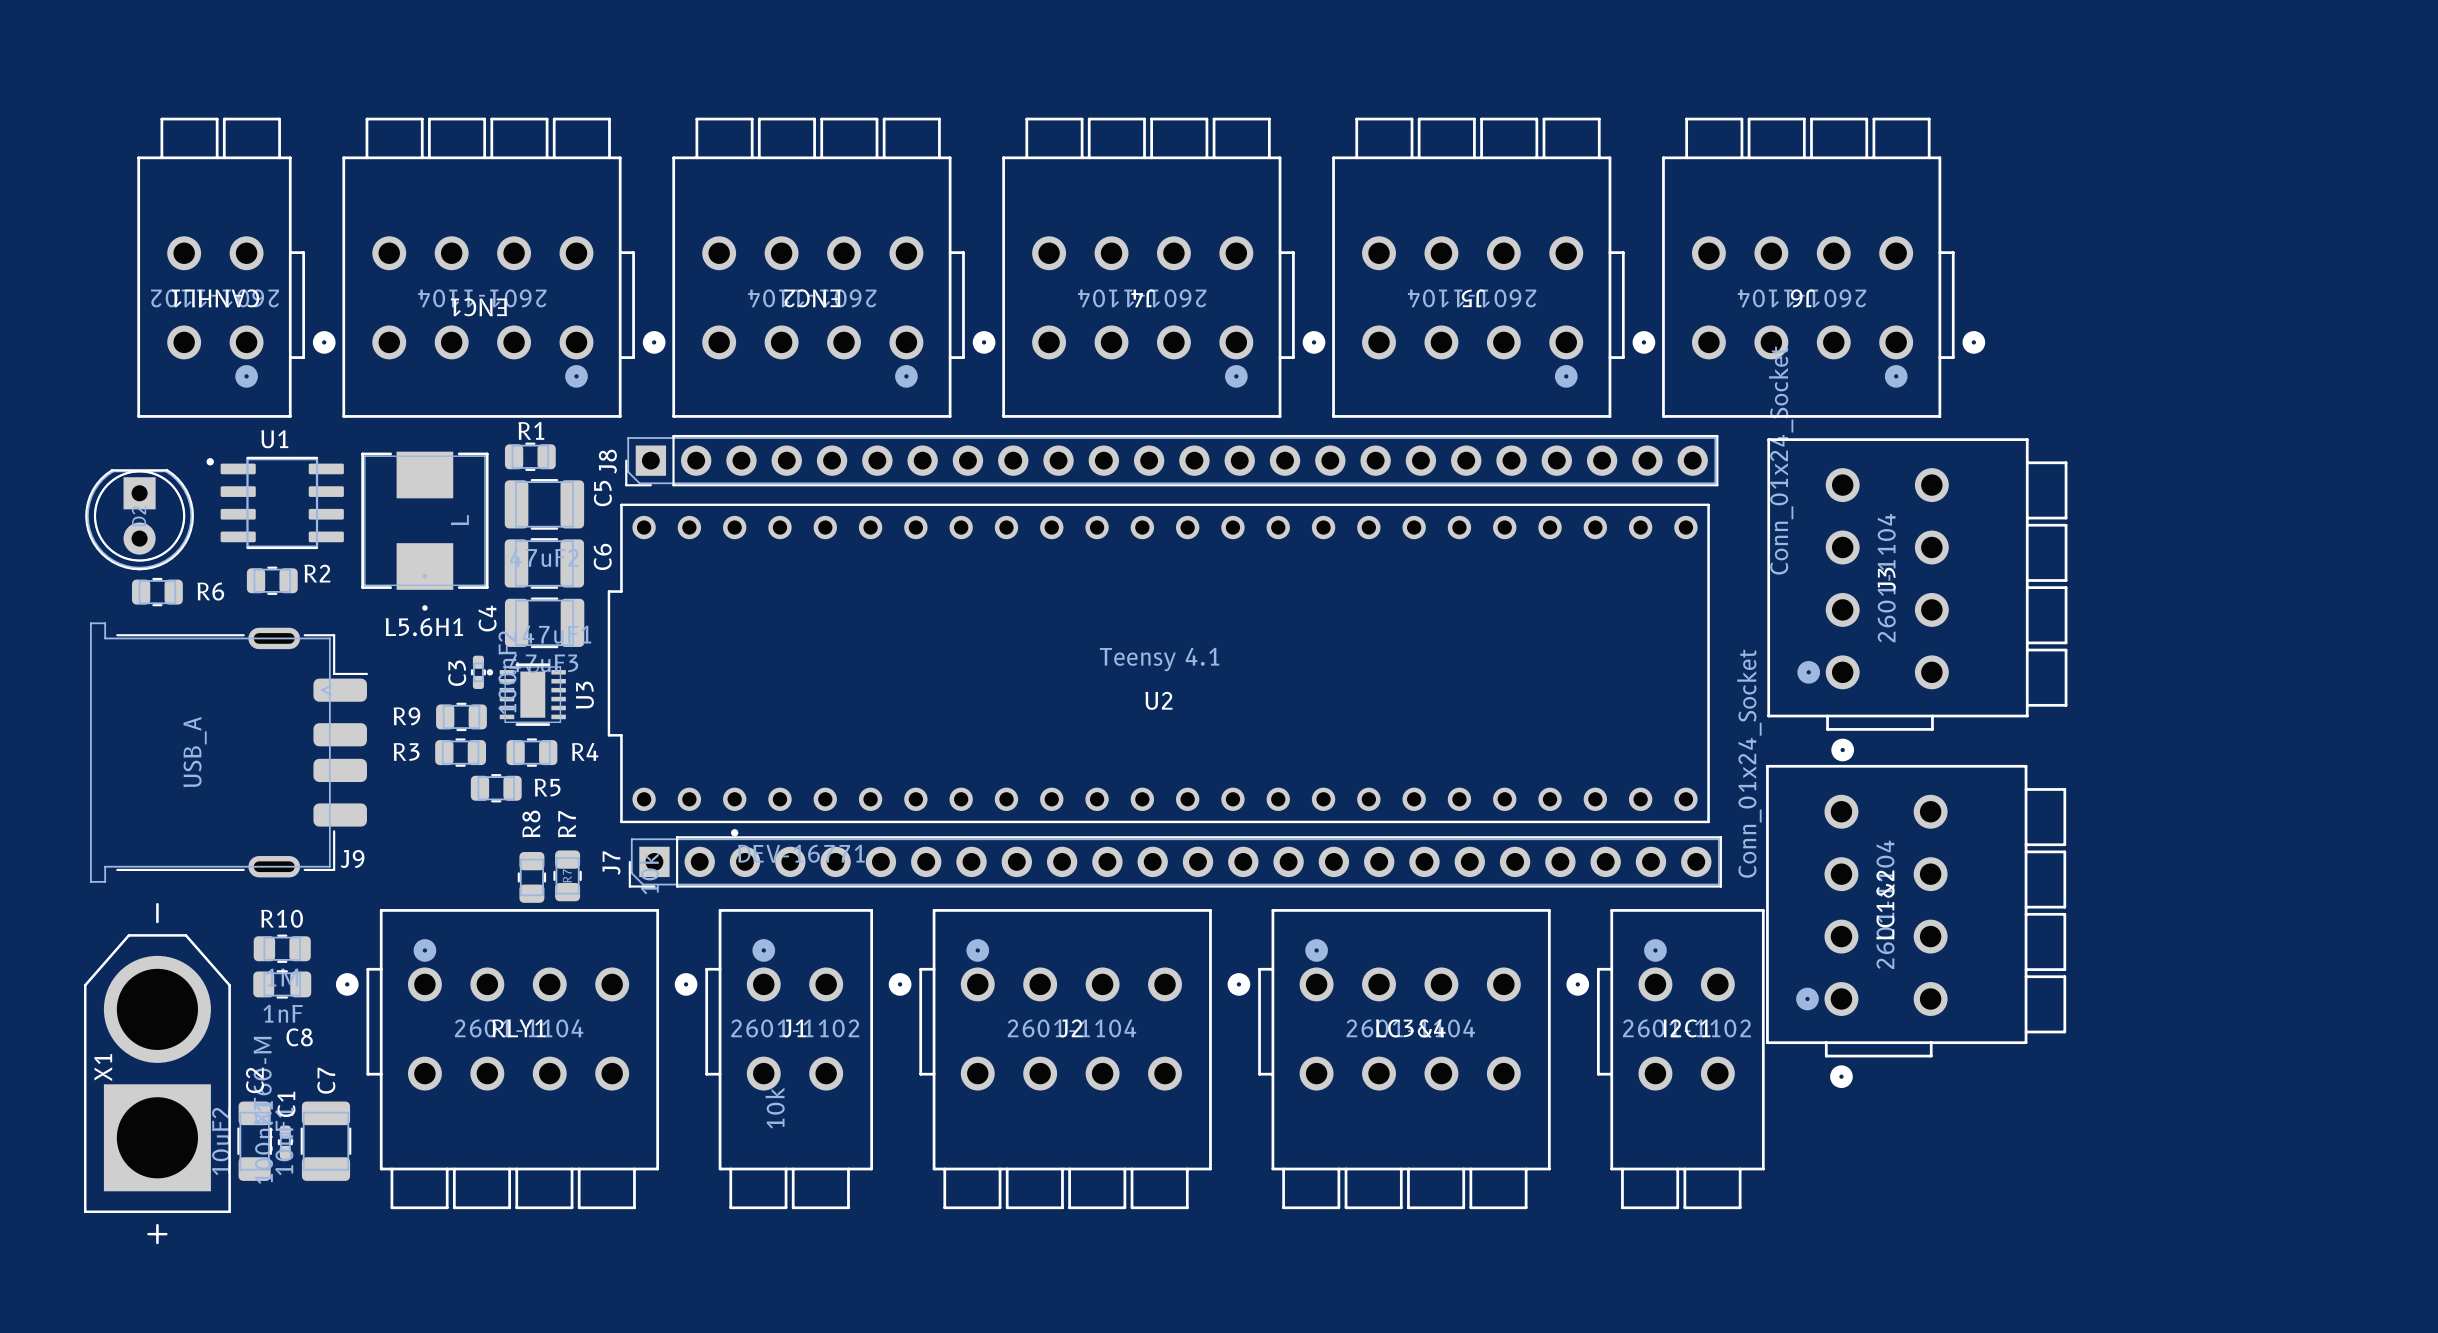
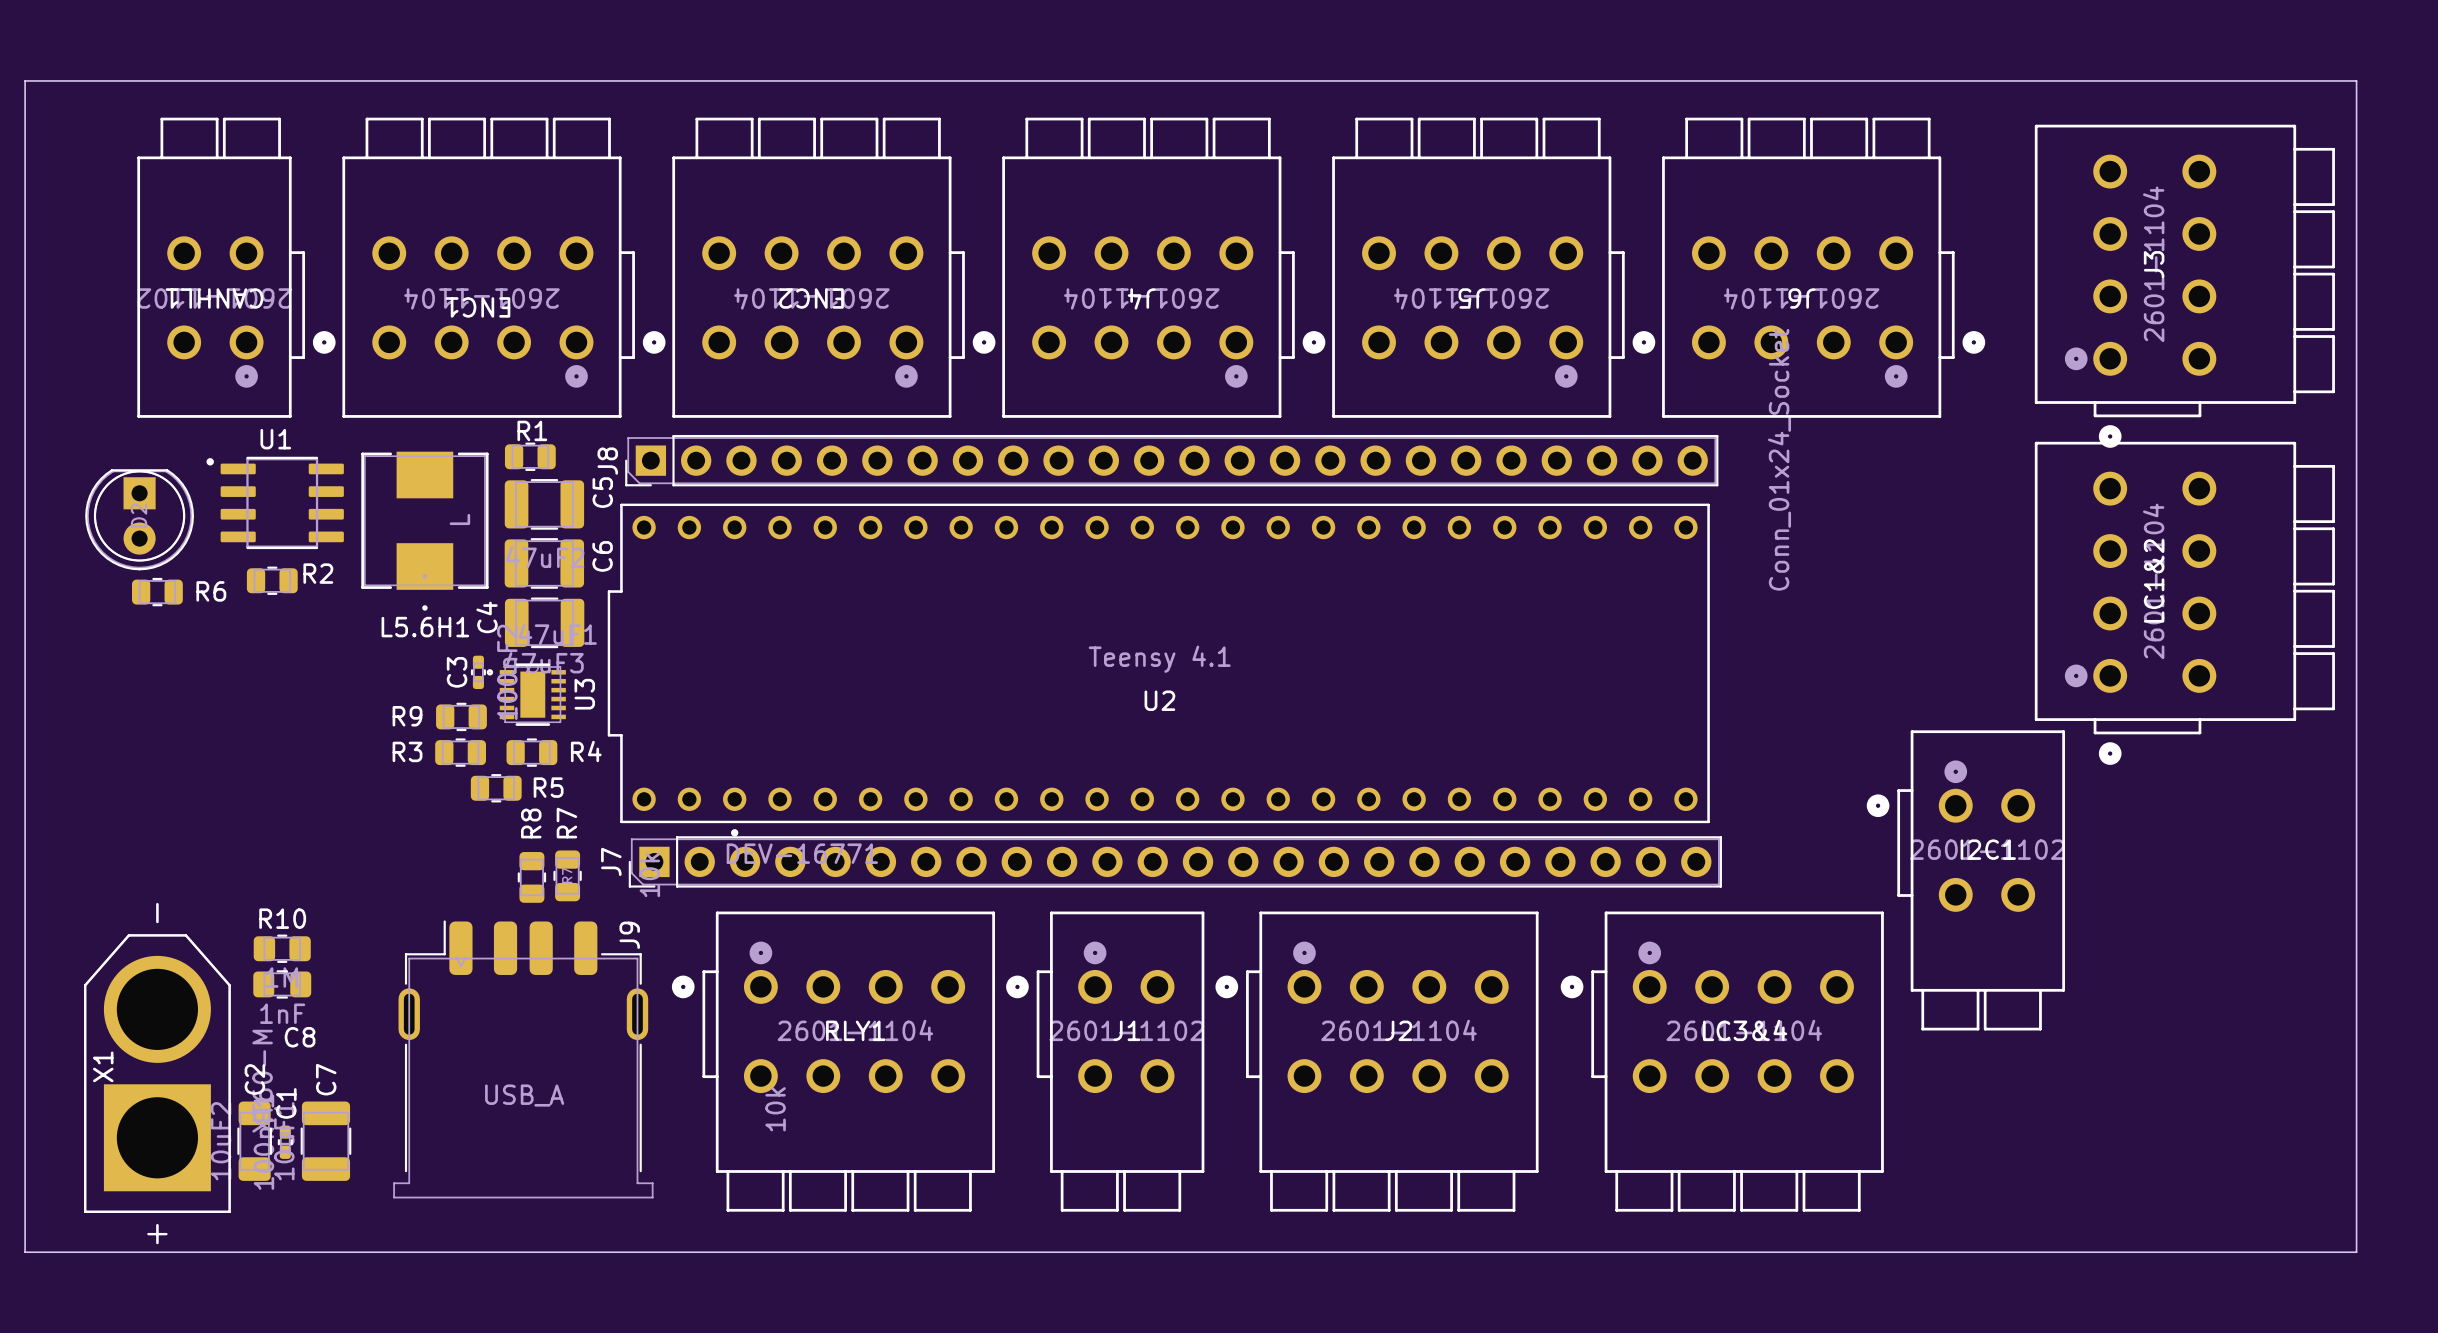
board edge: none -> (25, 80) (2356, 80) (2356, 1252) (25, 1252) (25, 80)
J3 position: (1917, 599) -> (2184, 286)
J9 rotation: 0° (229, 752) -> 90° counterclockwise (523, 1059)
J9 position: (229, 752) -> (523, 1059)
J7 value: Conn_01x24_Socket (1749, 763) -> none
LC1&2 position: (1916, 926) -> (2184, 603)
RLY1 position: (497, 1059) -> (833, 1061)
J1 position: (773, 1059) -> (1105, 1061)
J2 position: (1050, 1059) -> (1377, 1061)
LC3&4 position: (1389, 1059) -> (1722, 1061)
I2C1 position: (1665, 1059) -> (1965, 880)

